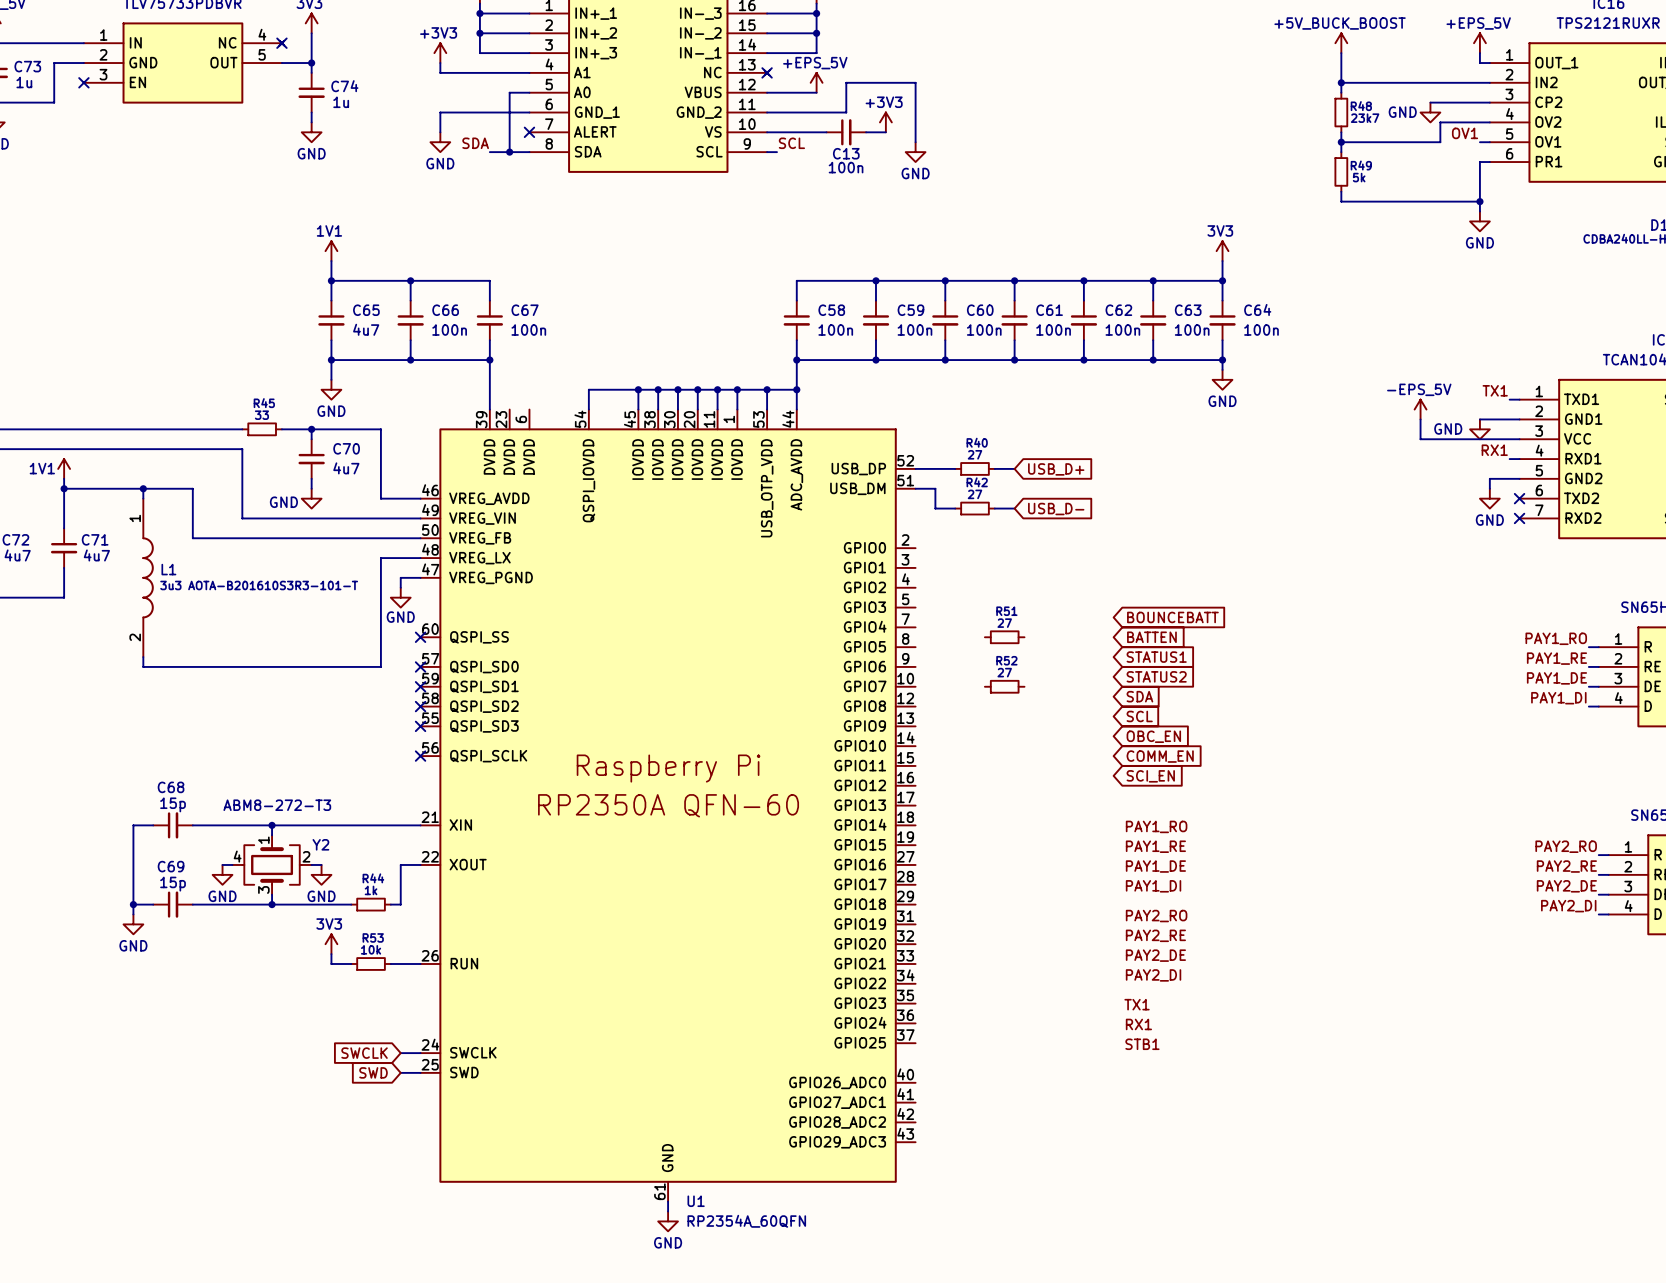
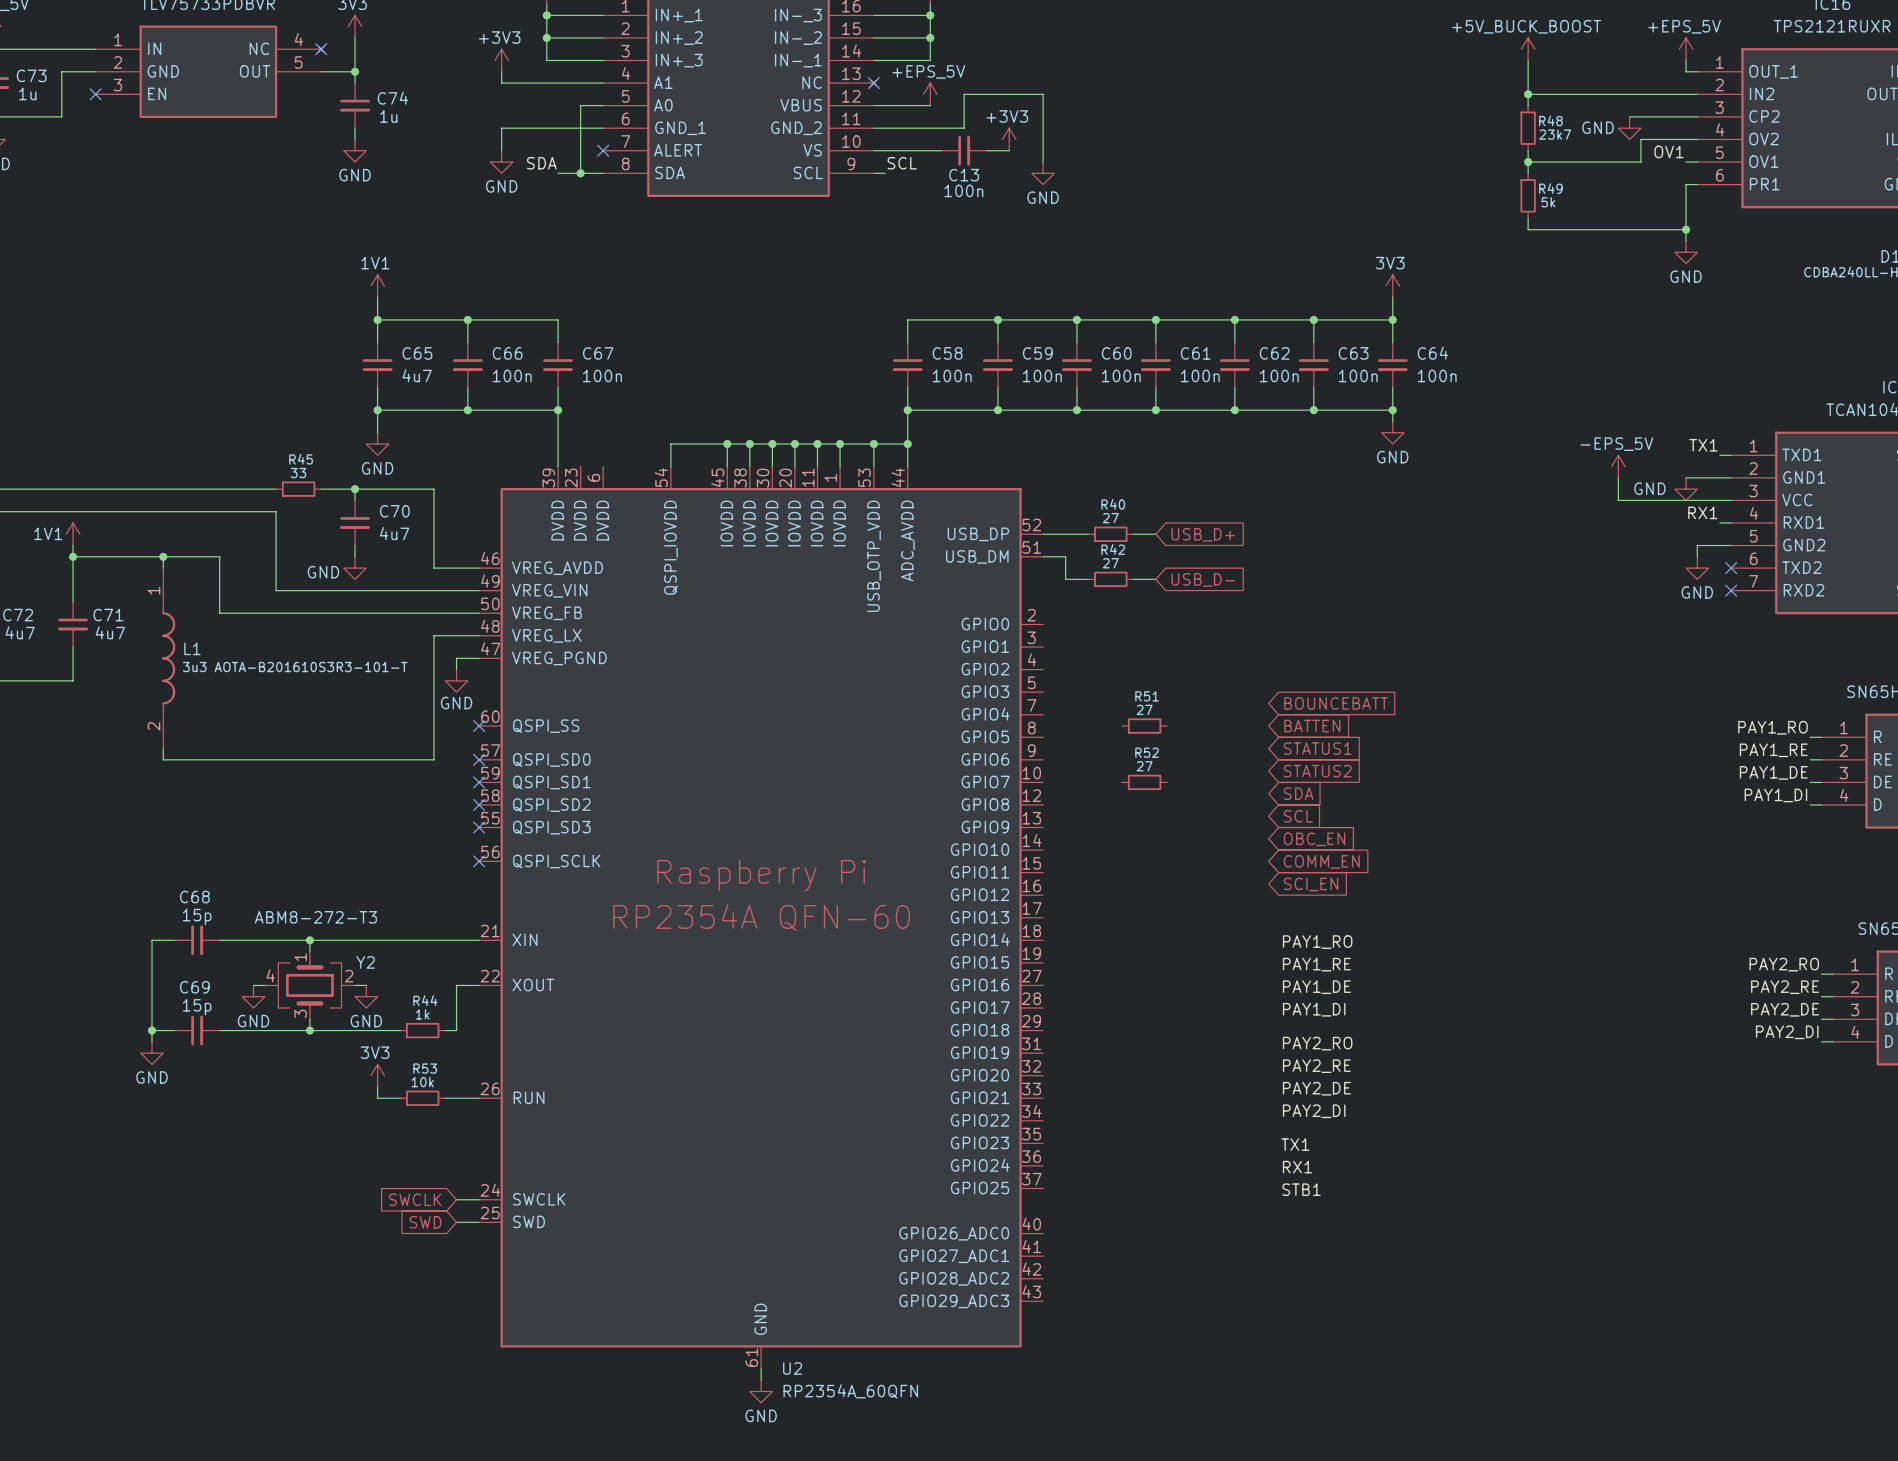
U1 text: RP2350A QFN-60 (668, 805) -> RP2354A QFN-60 (761, 917)
U1 name: U1 (696, 1201) -> U2 (792, 1368)

